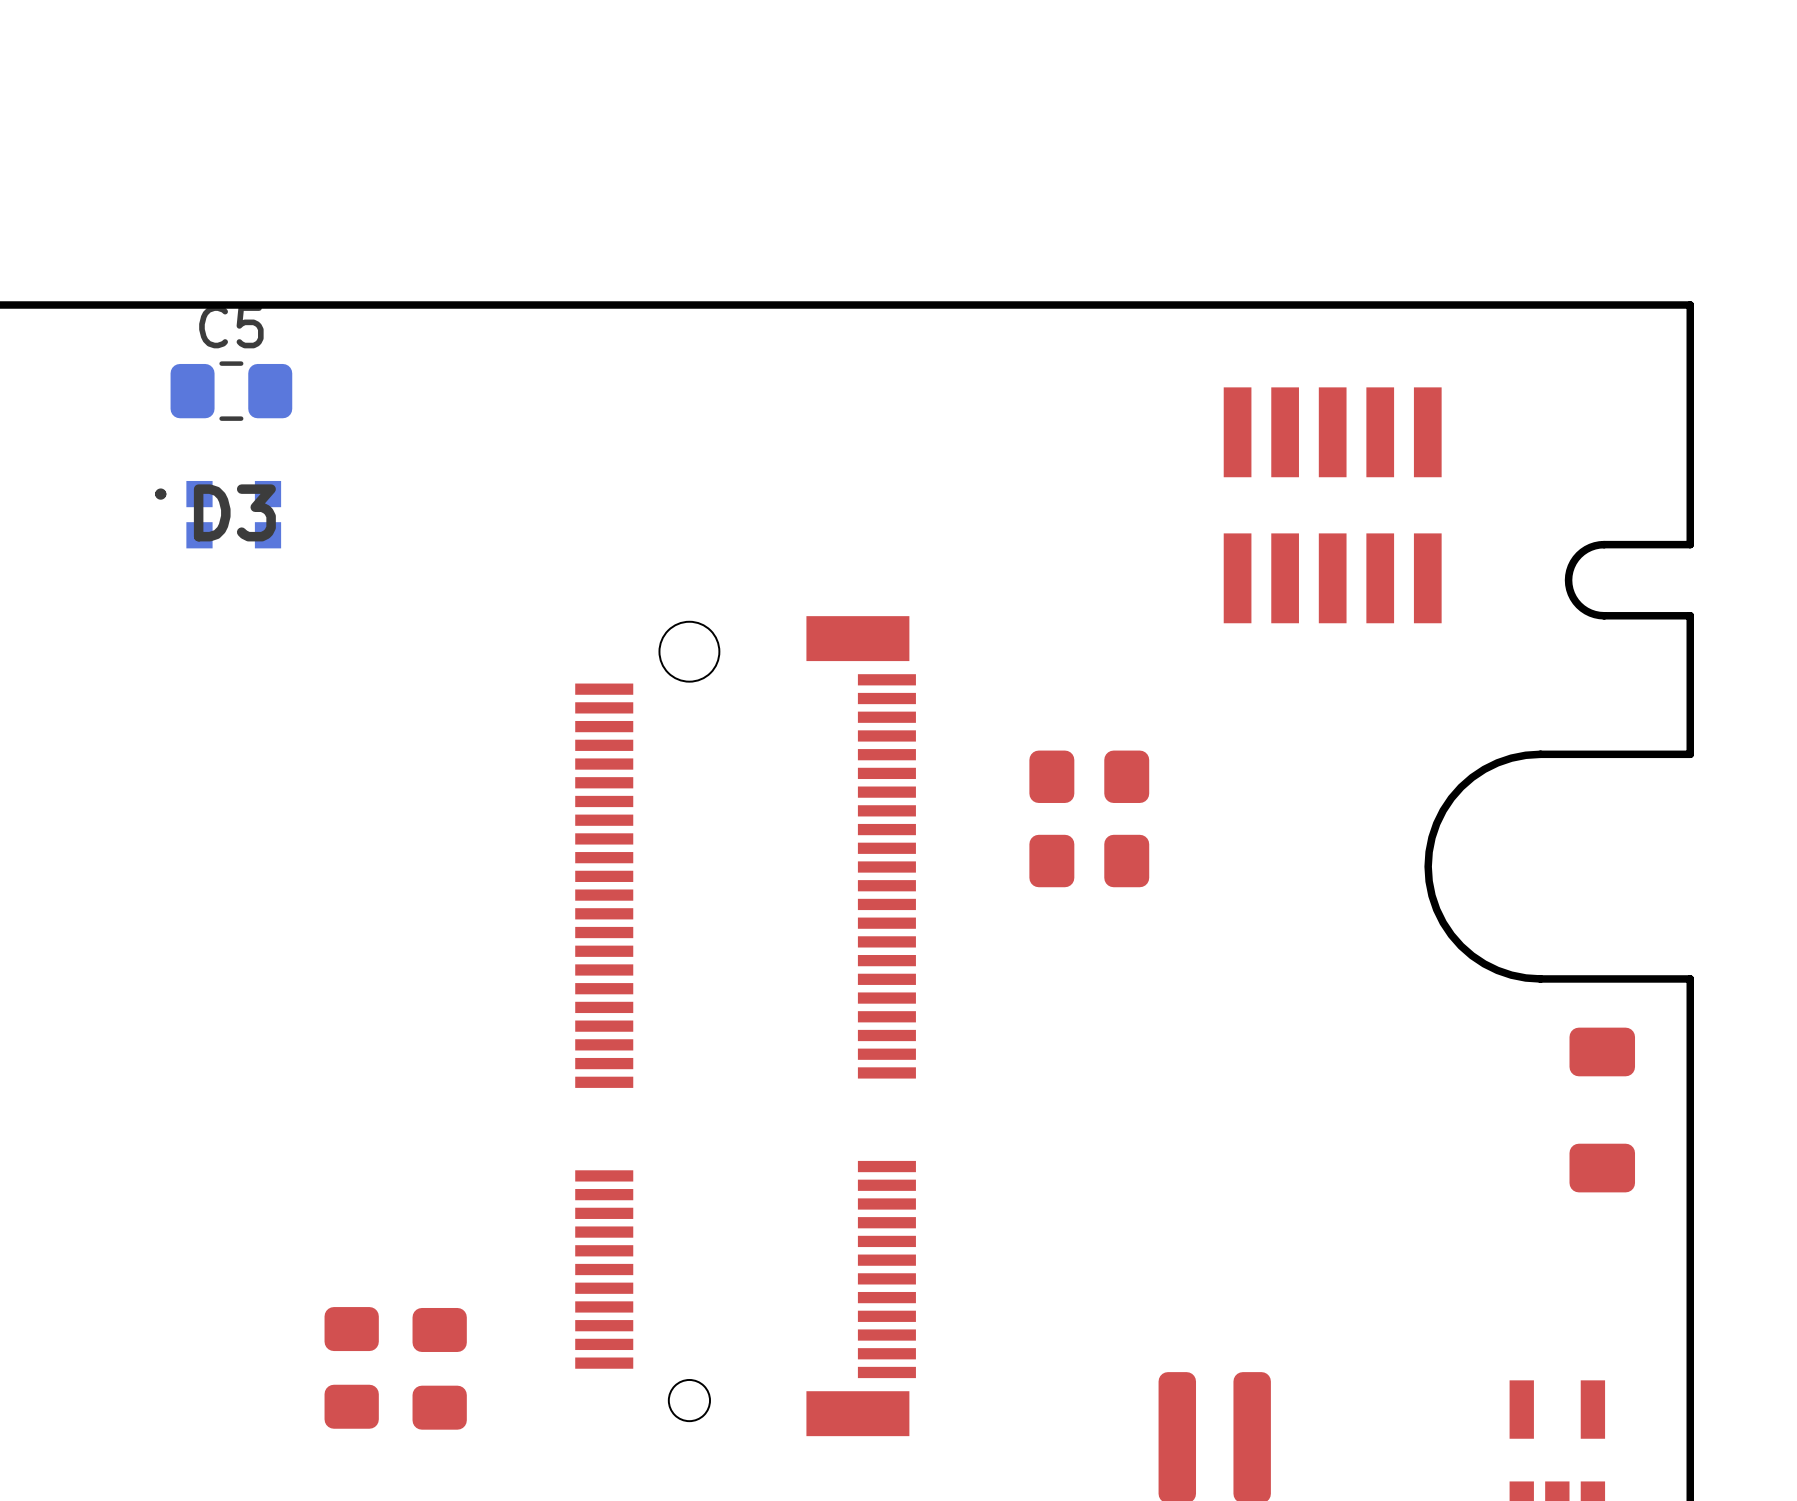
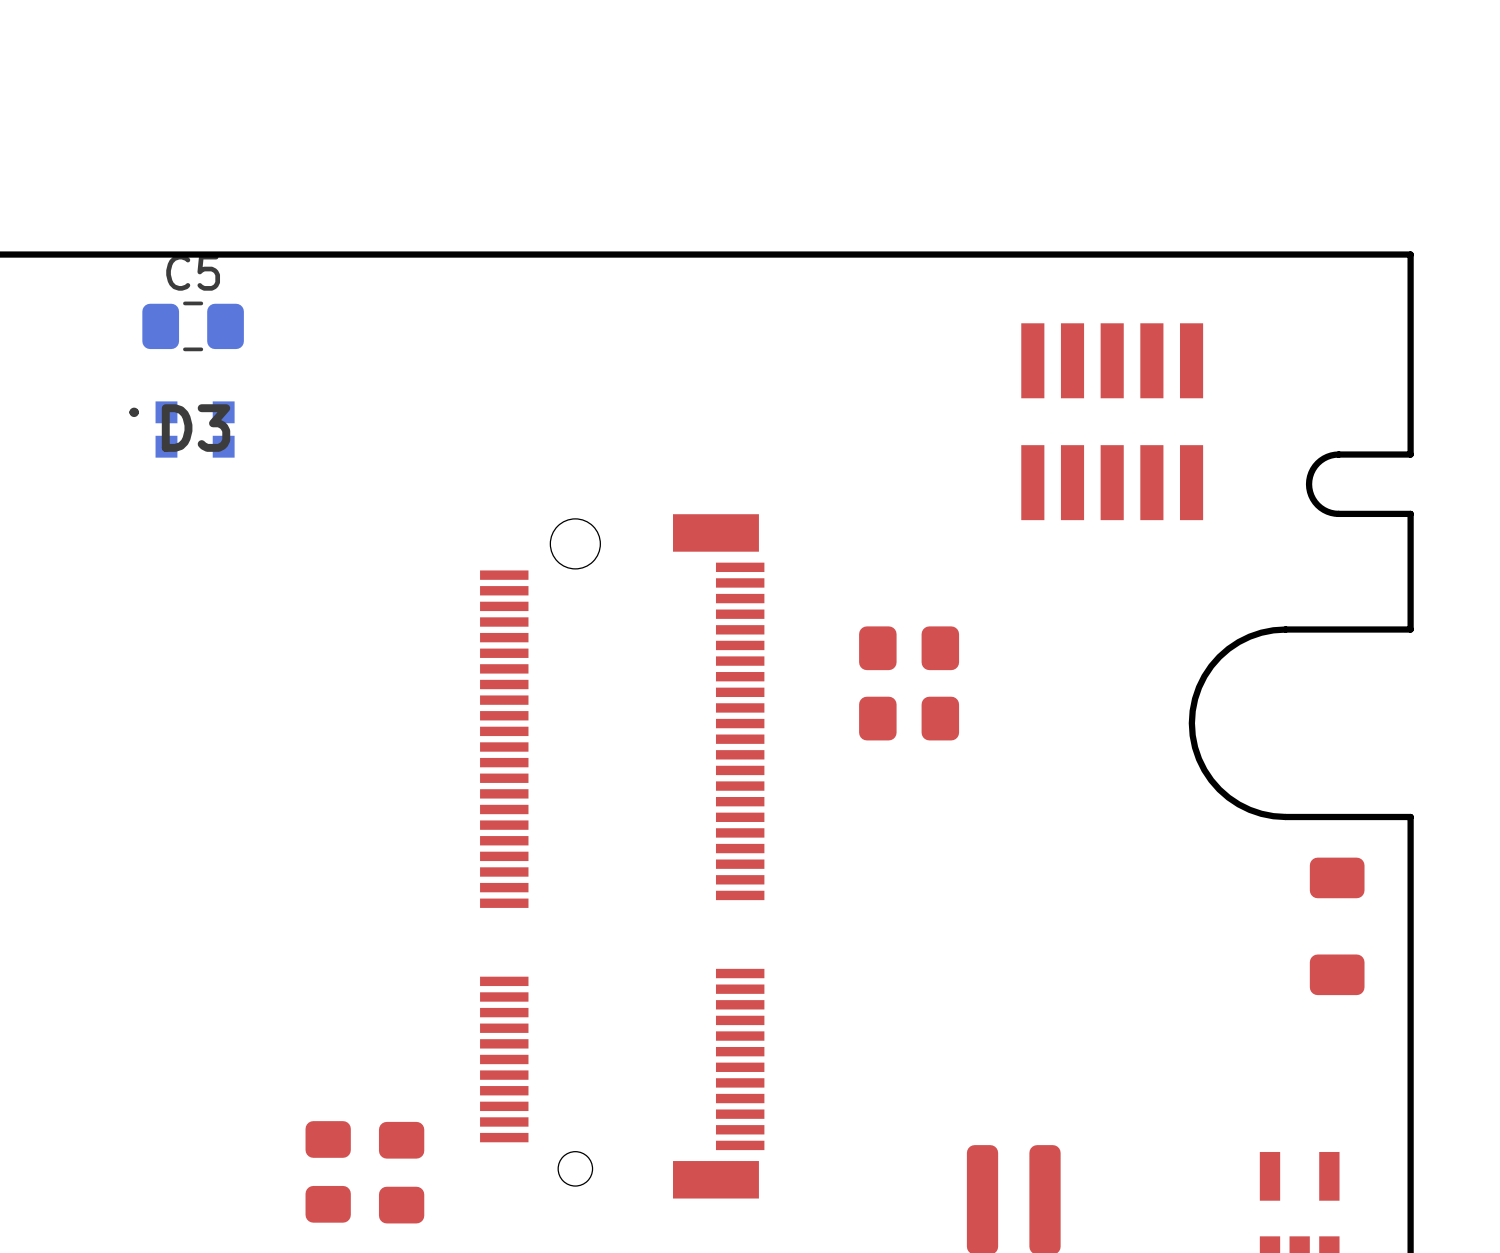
part: (351, 1367) -> none
part: (439, 1368) -> none
part: none -> (328, 1171)
part: none -> (401, 1172)

